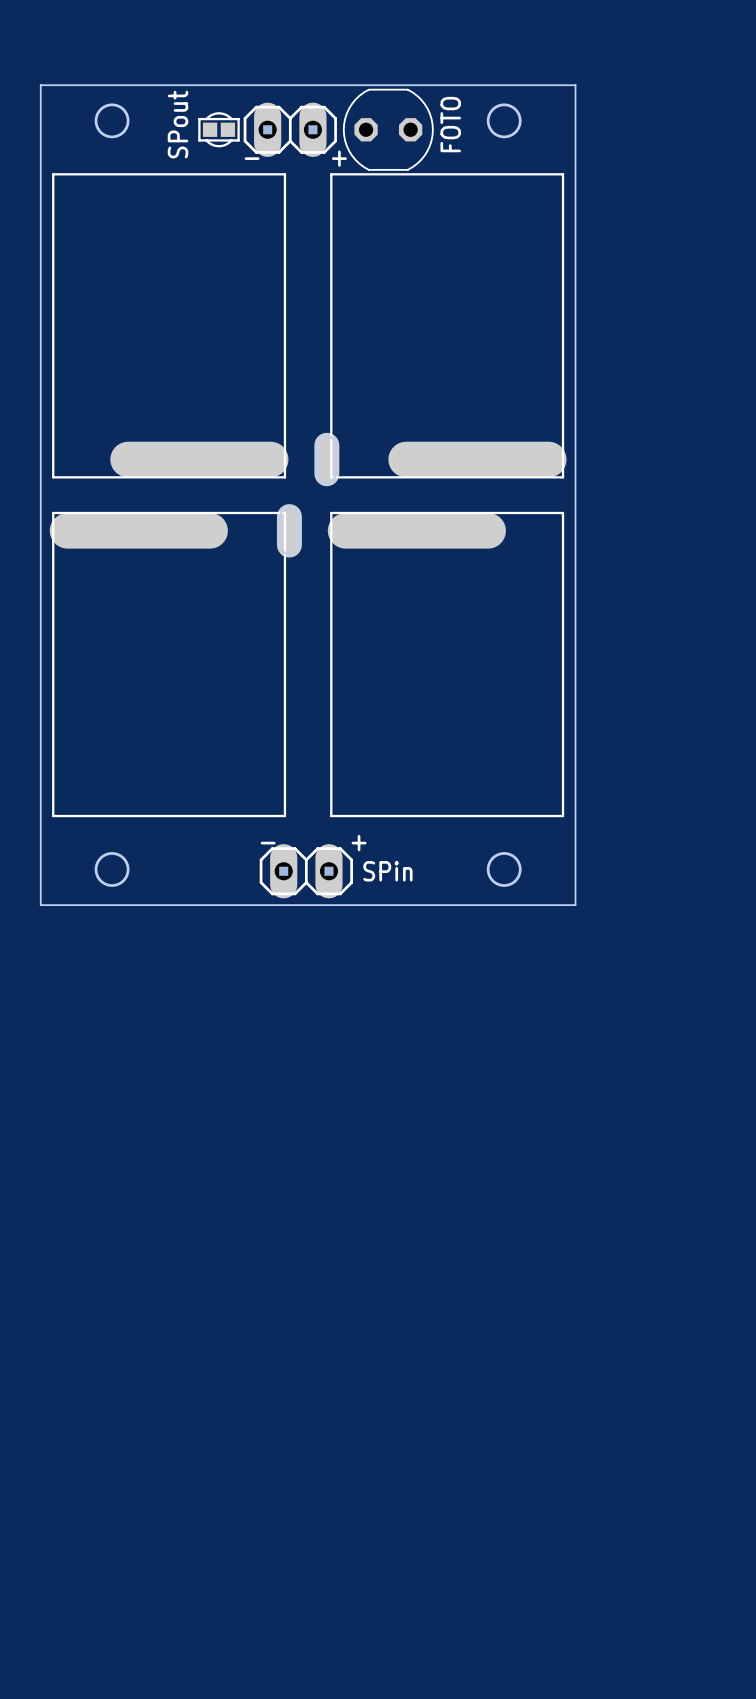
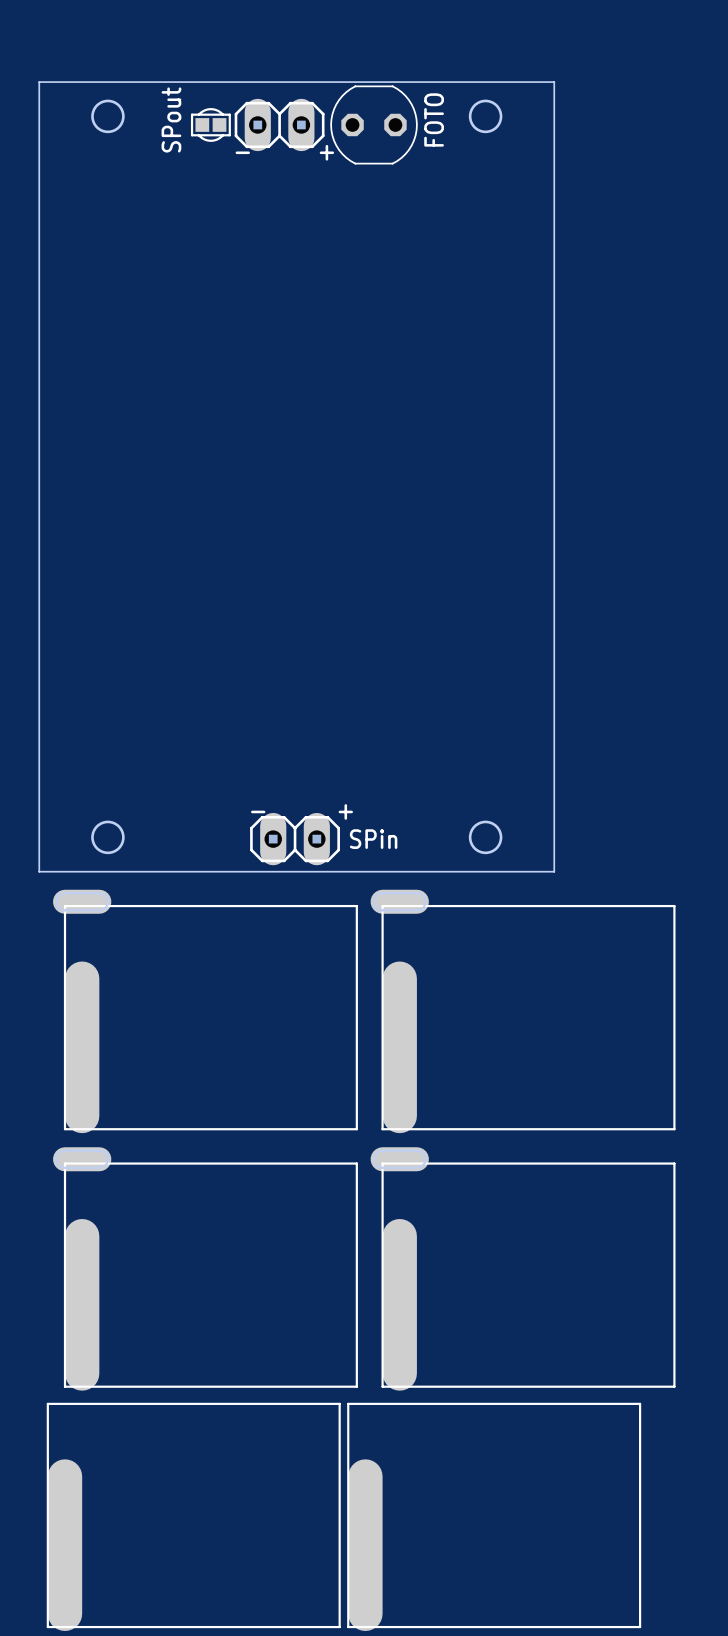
part: (170, 325) -> none
part: (440, 329) -> none
part: (175, 660) -> none
part: (445, 664) -> none
part: none -> (205, 1011)
part: none -> (523, 1011)
part: none -> (205, 1268)
part: none -> (523, 1268)
part: none -> (193, 1516)
part: none -> (494, 1516)

